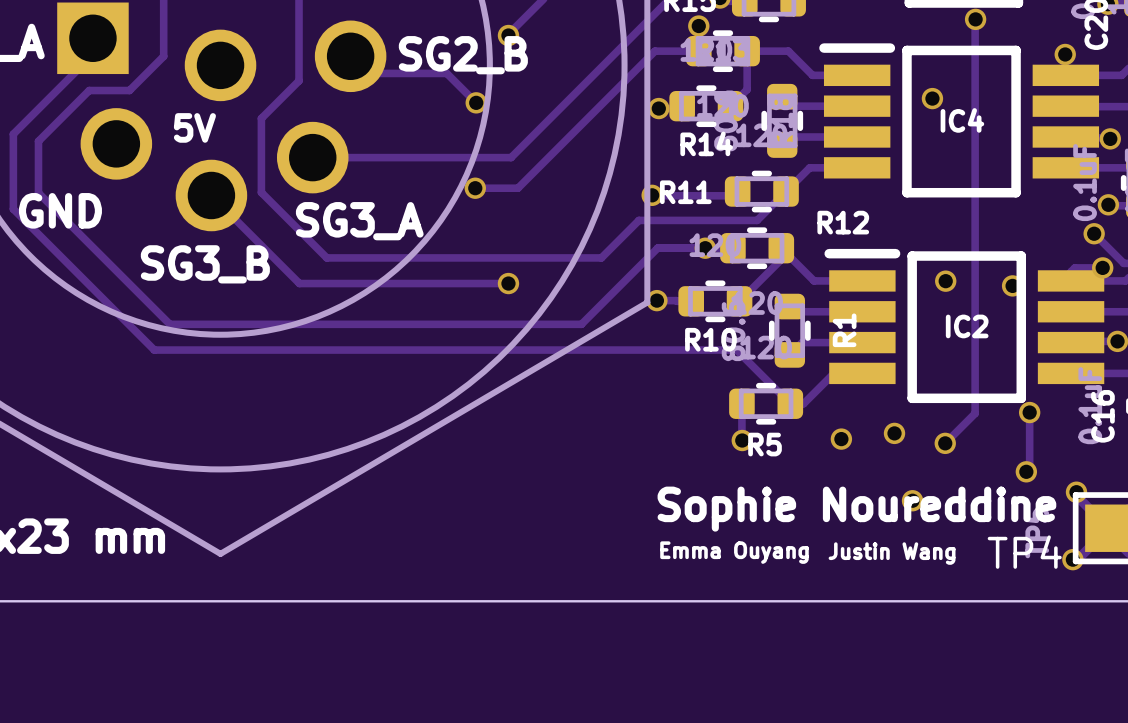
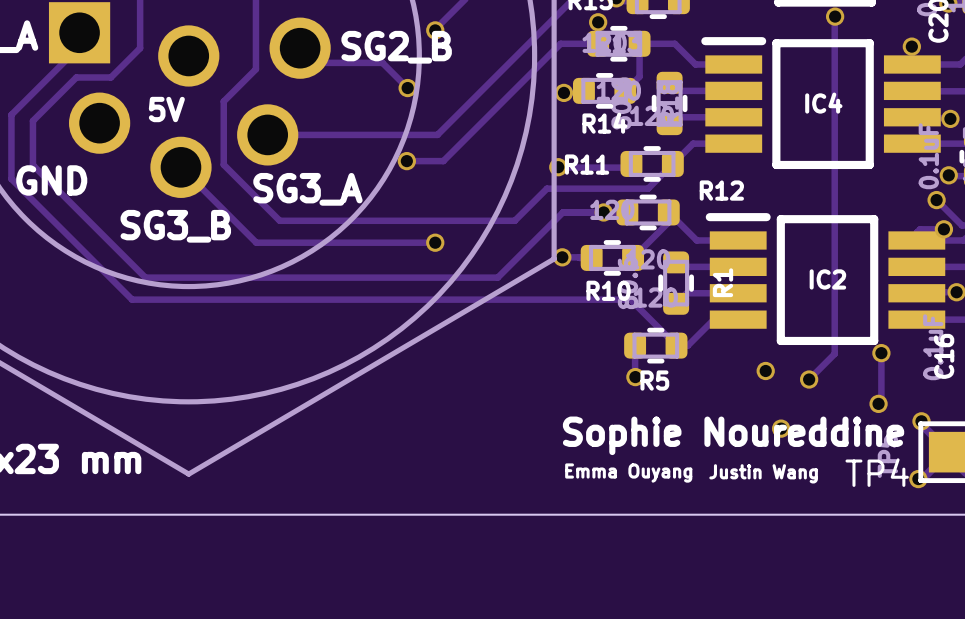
via: (932, 98) -> none
via: (945, 281) -> none
via: (1012, 285) -> none
via: (841, 439) -> none

